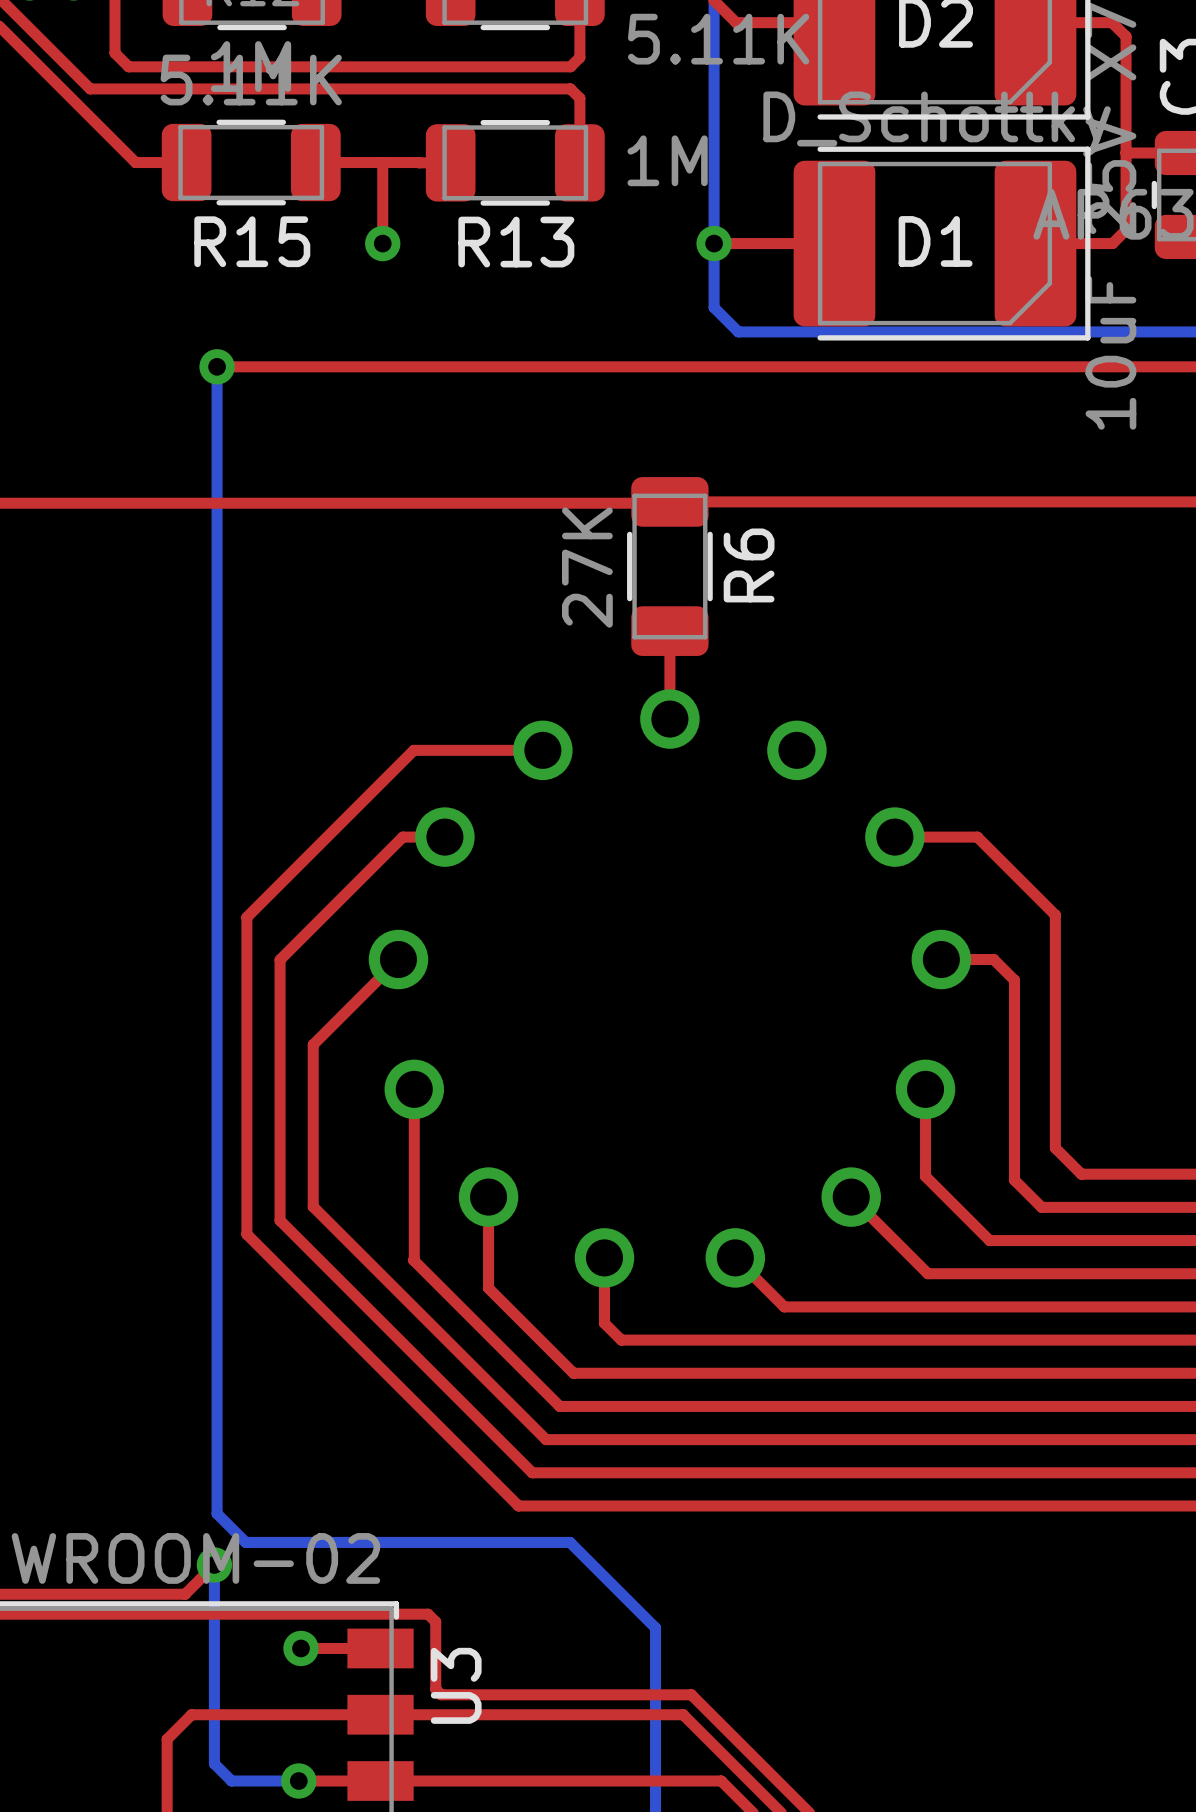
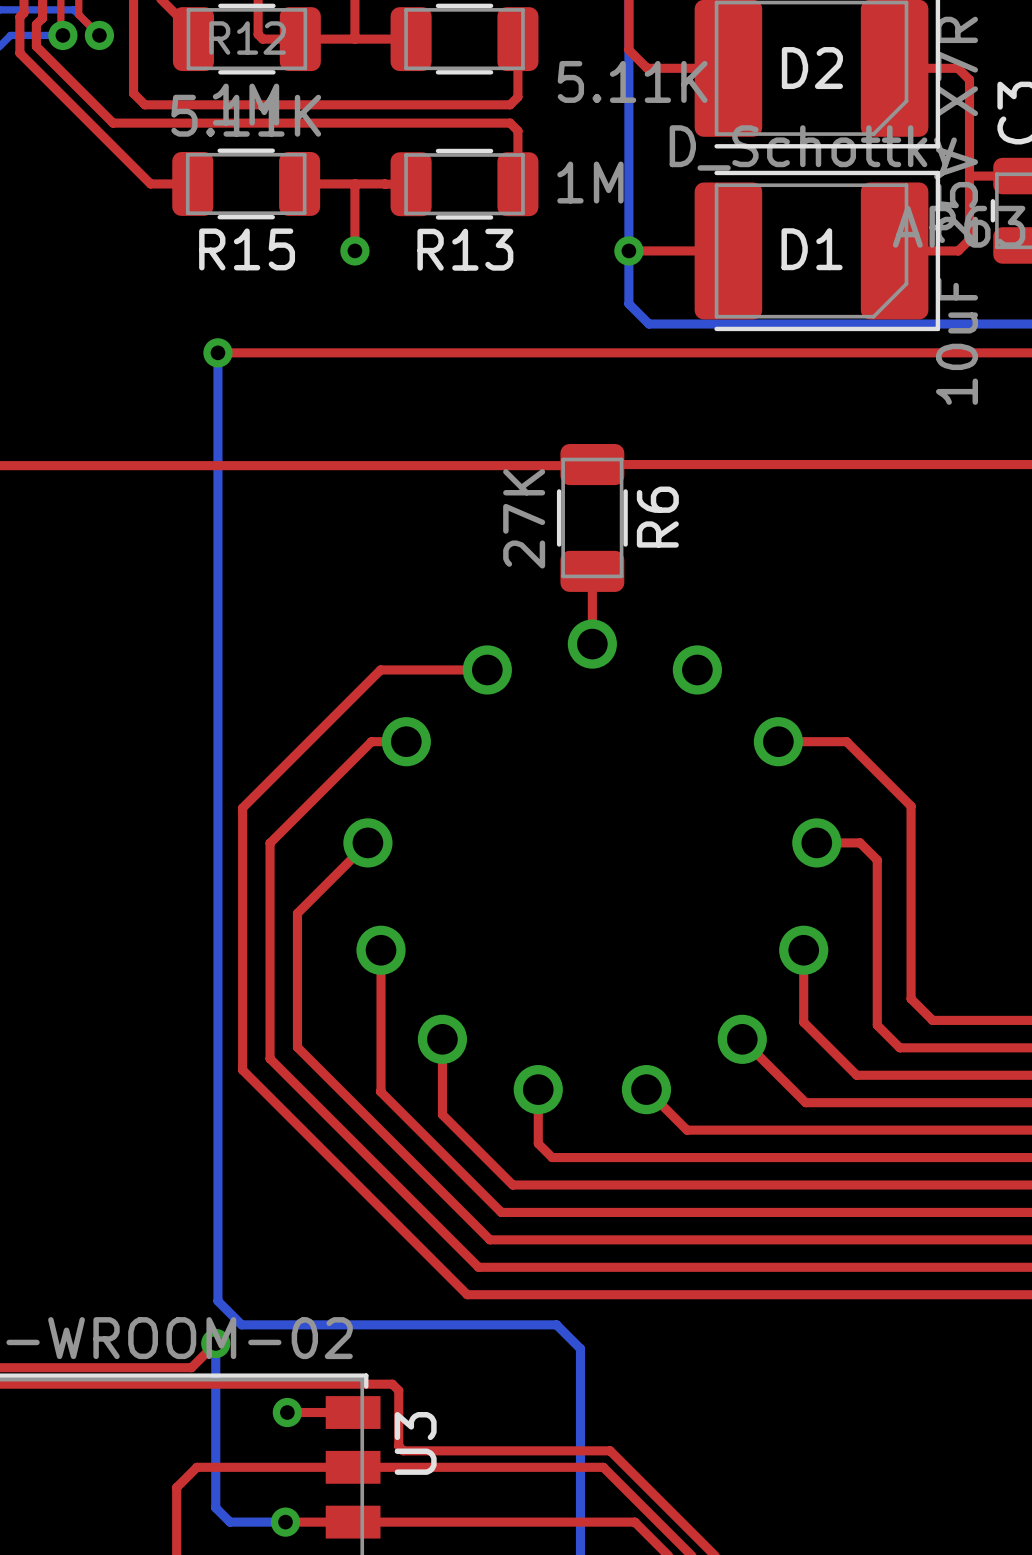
bottom track: (570, 1542) (655, 1627) -> (509, 1324) (556, 1324) (580, 1348) (580, 1395)

